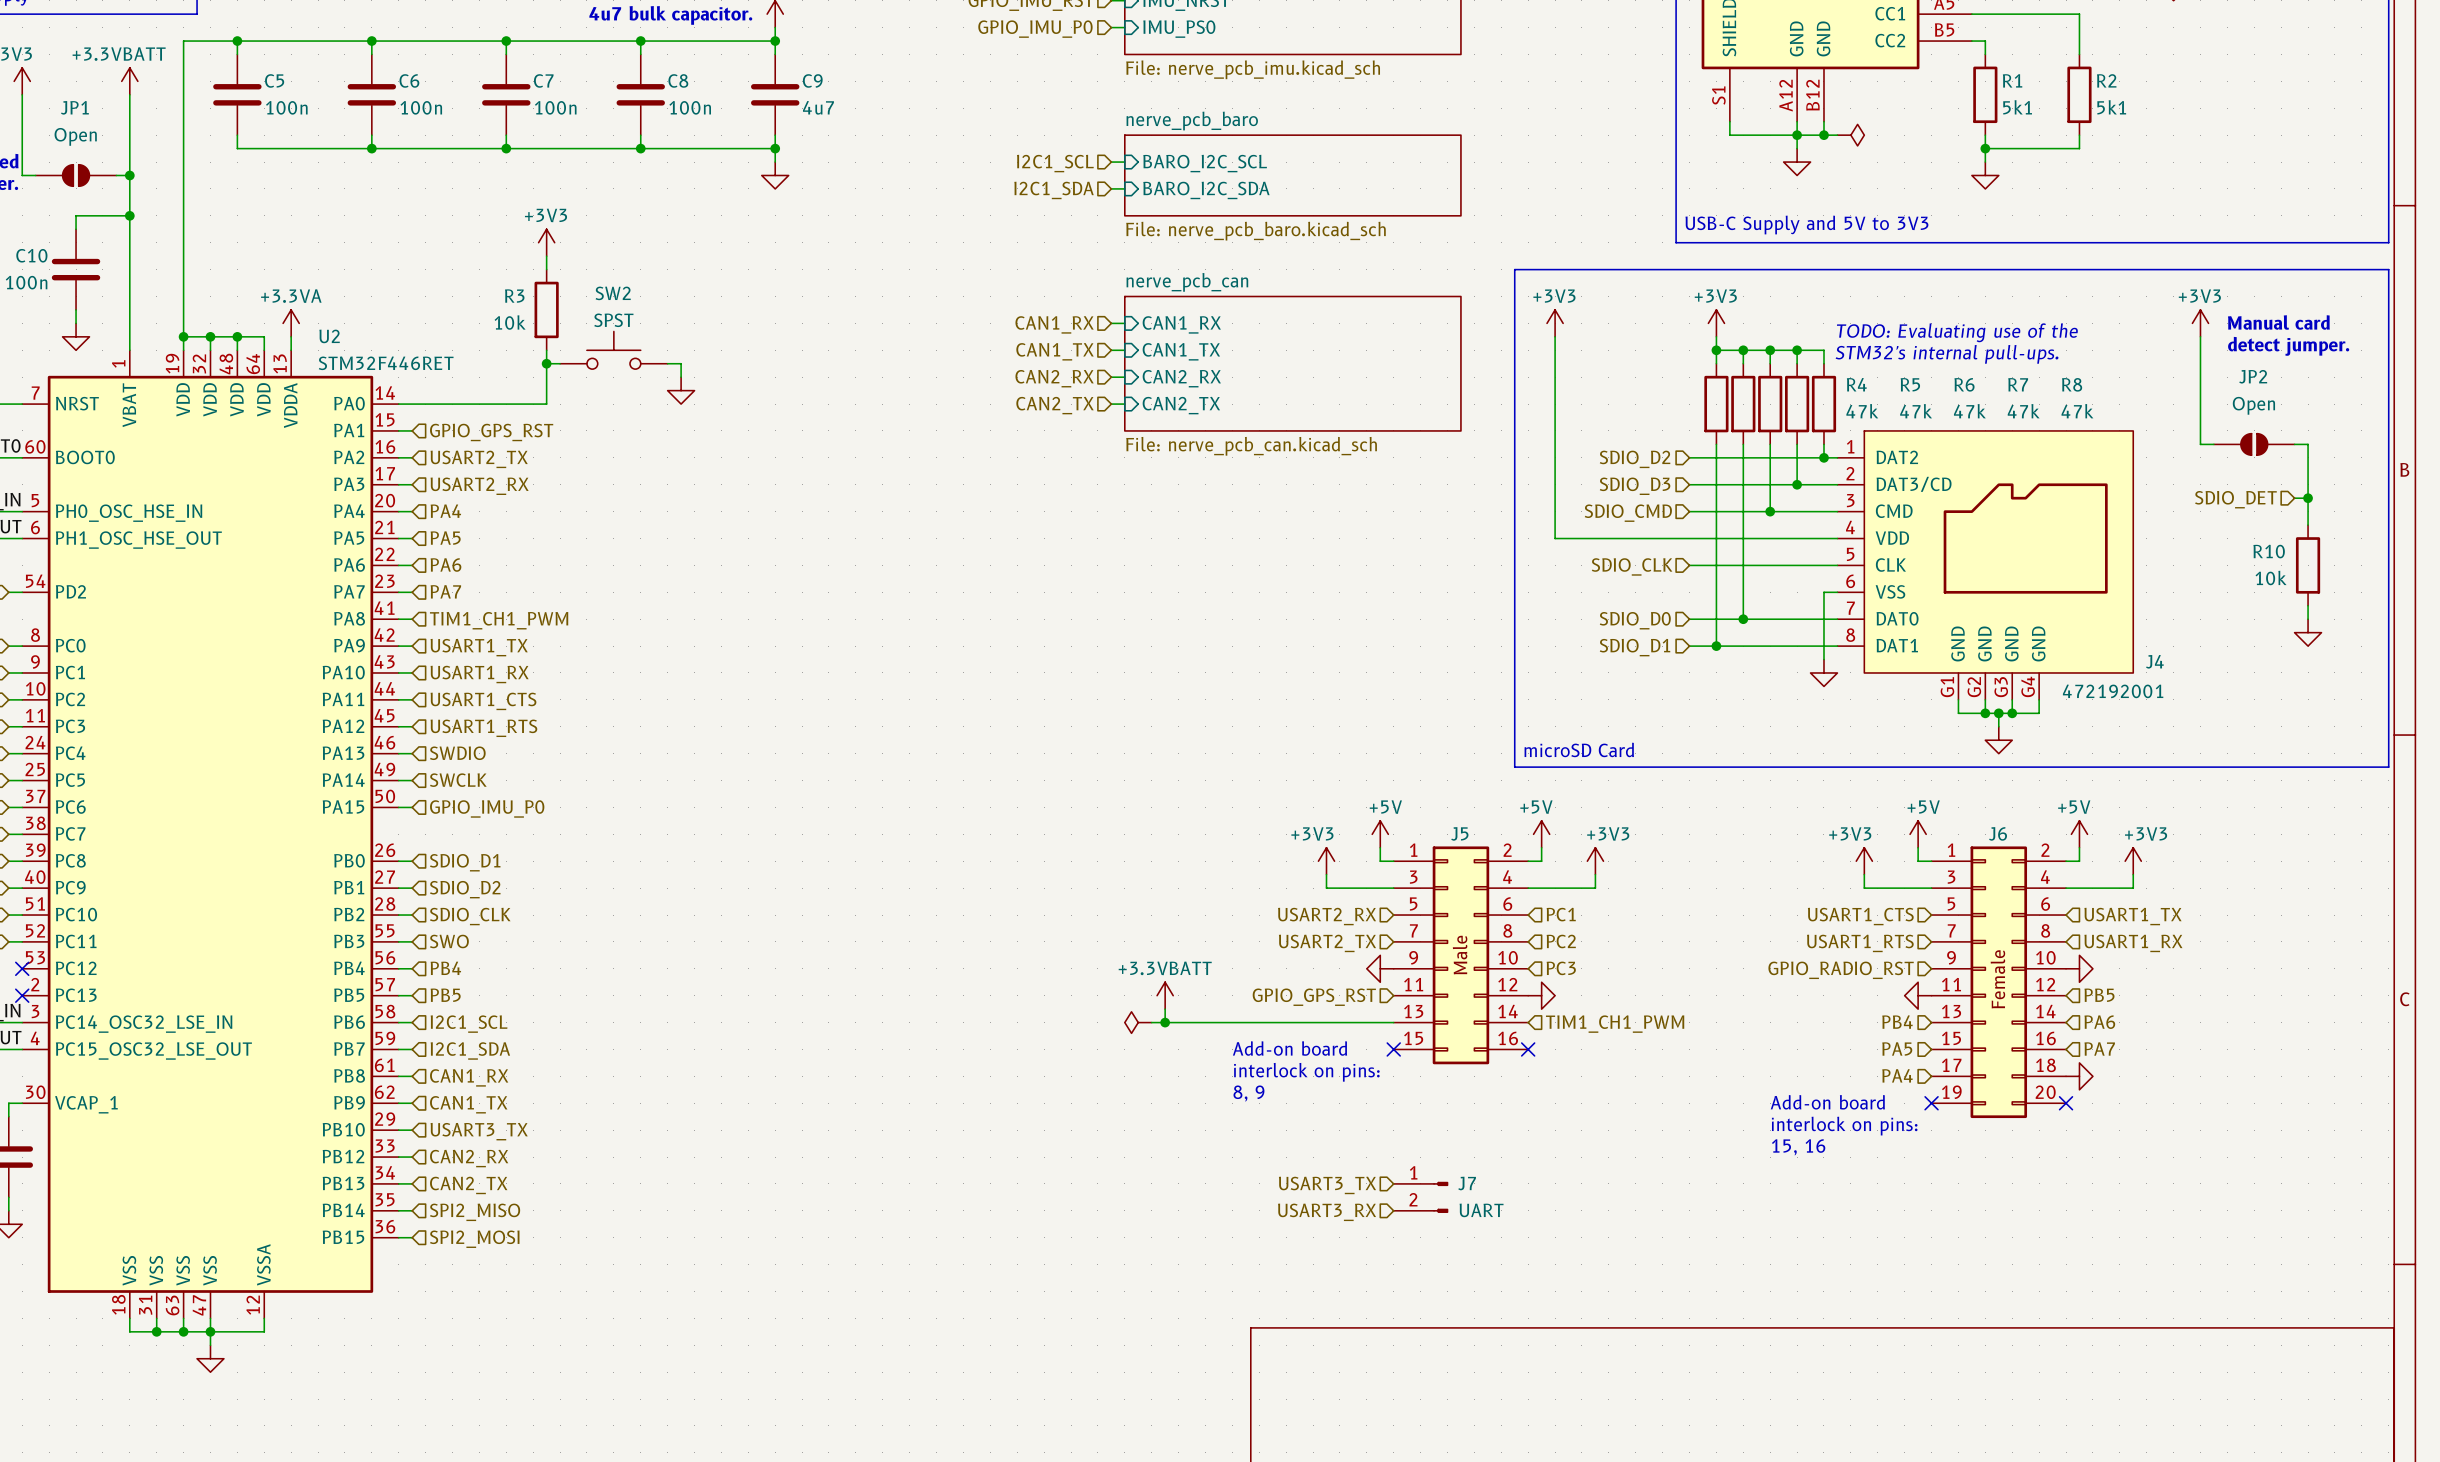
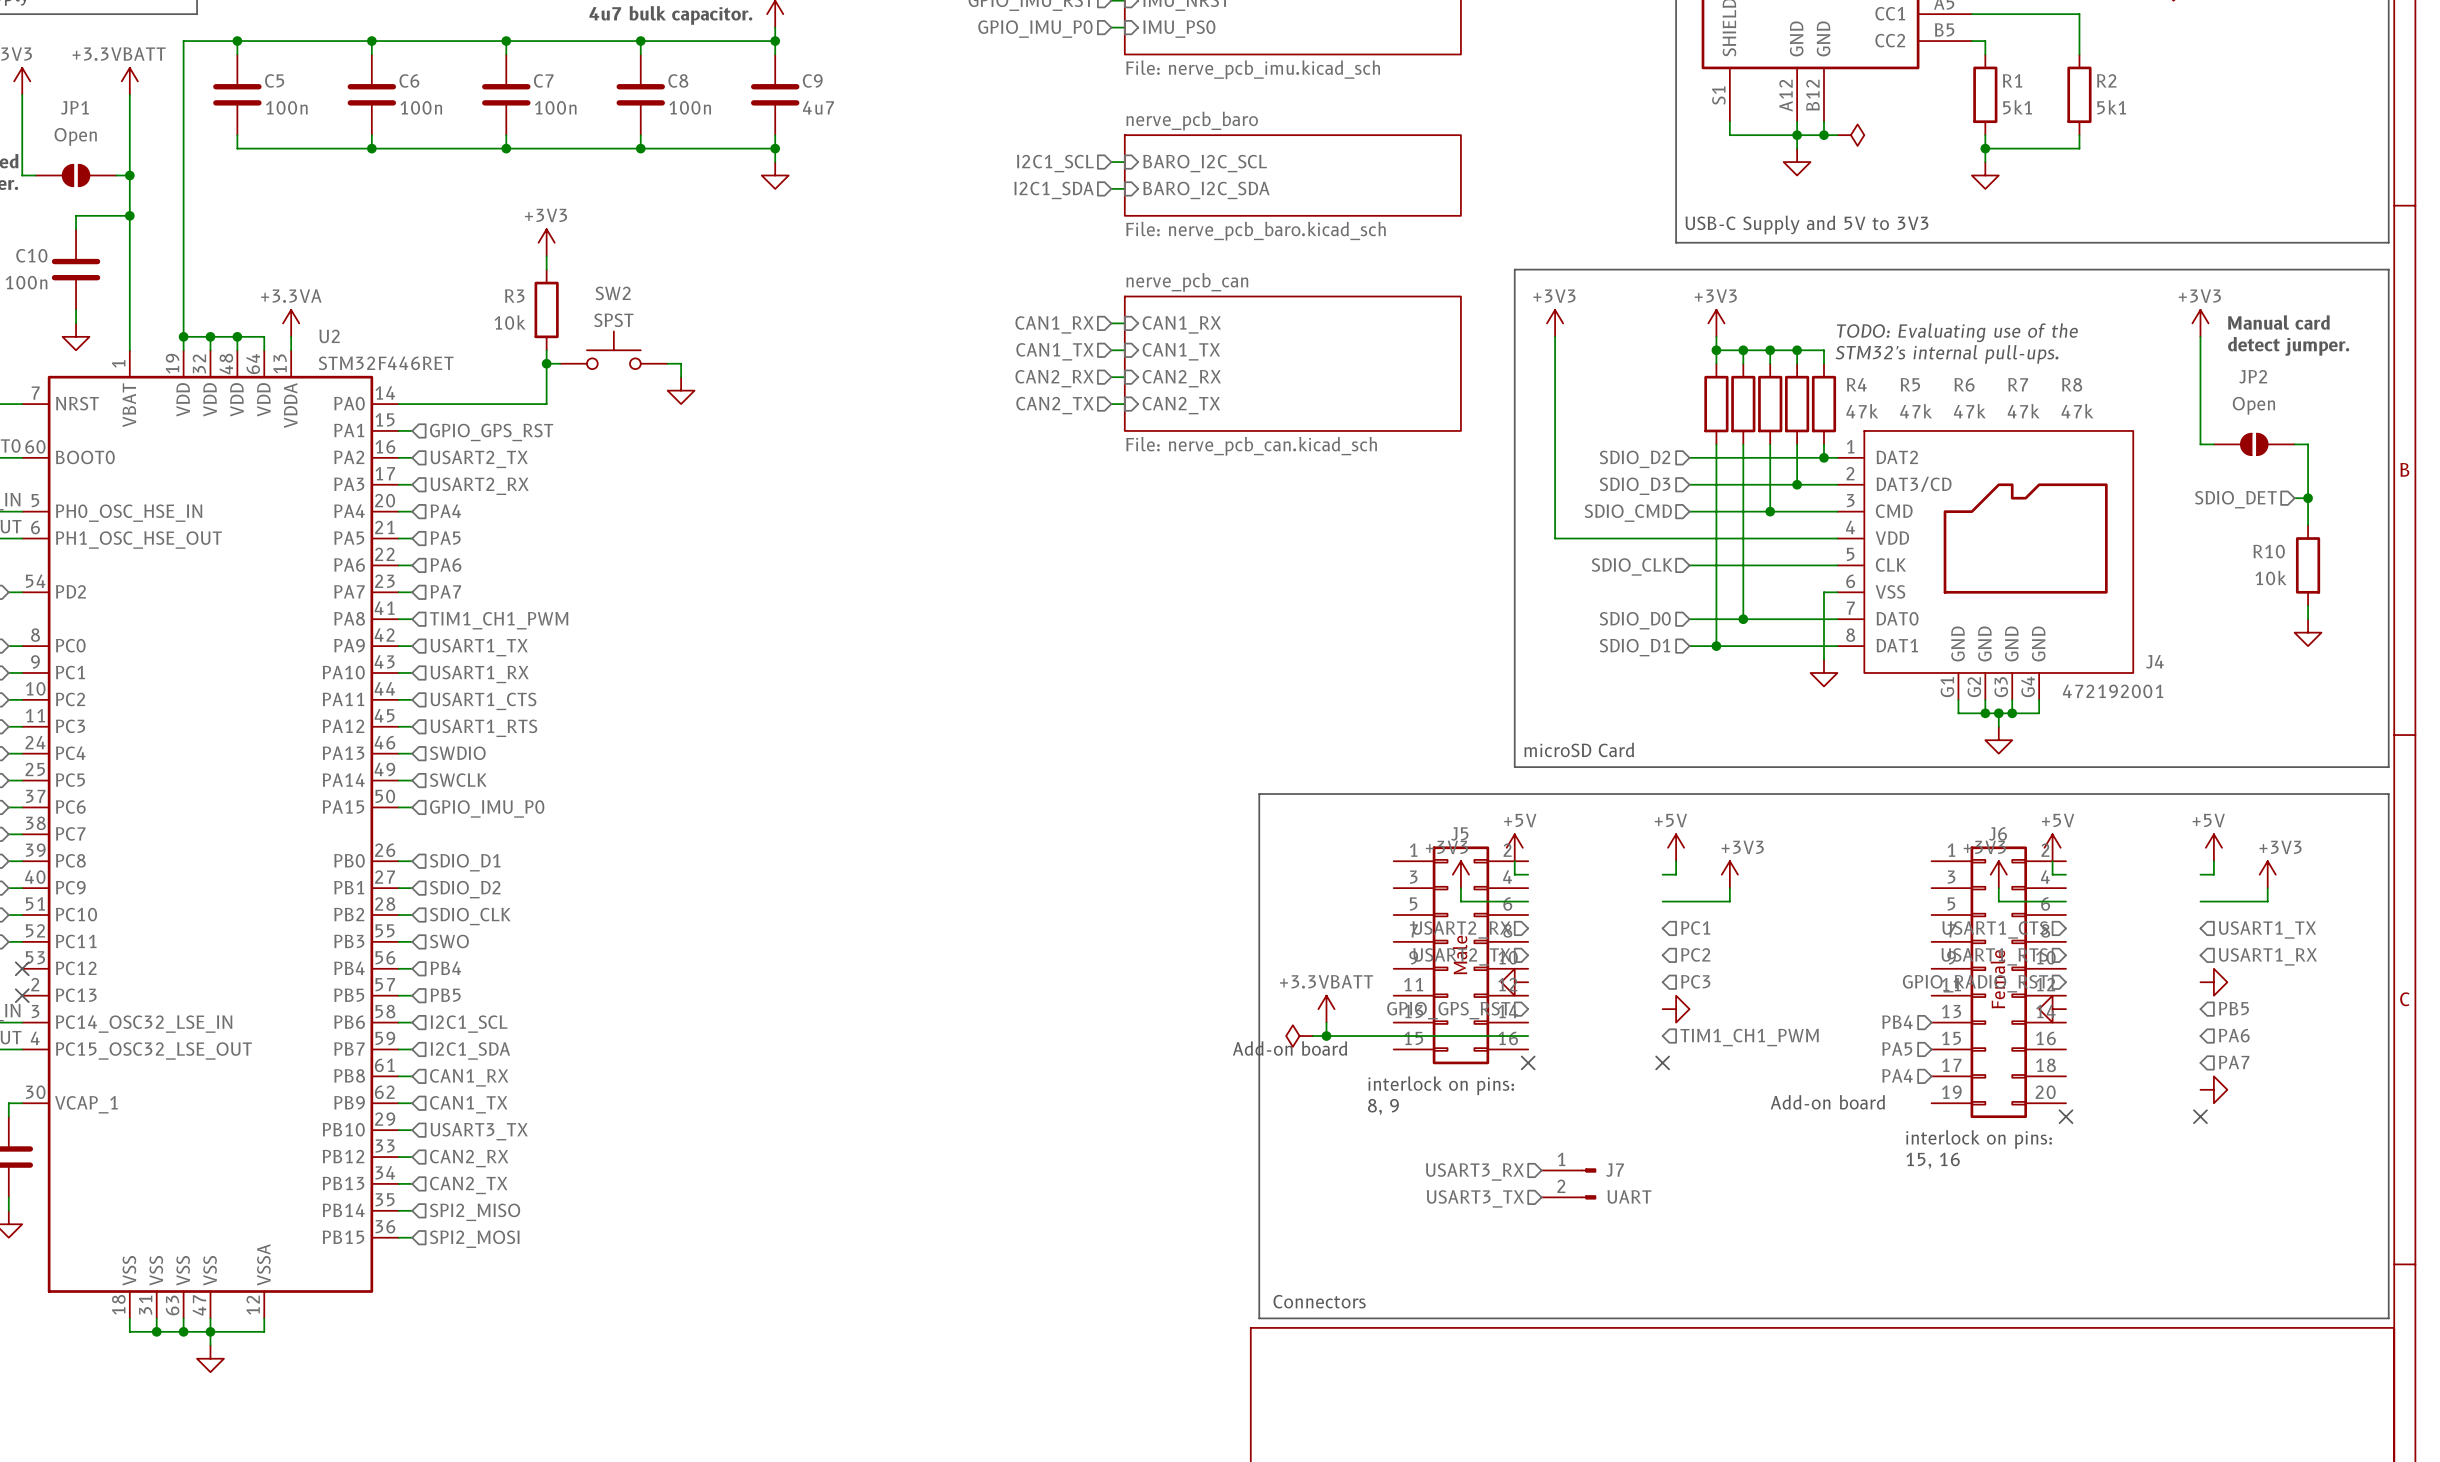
line: none -> (1259, 794) (2388, 794) (2388, 1318) (1259, 1318) (1259, 794)
power symbol text position: +5V (1536, 807) -> +5V (1520, 820)
power symbol text position: +5V (2074, 807) -> +5V (2058, 820)
power symbol: +5V (1380, 834) -> none
power symbol position: +5V (1541, 834) -> +5V (1514, 847)
power symbol: +5V (1918, 834) -> none
power symbol position: +5V (2079, 834) -> +5V (2052, 847)
wire: (1380, 847) (1380, 861) (1393, 861) -> (1514, 861) (1514, 874) (1528, 874)
wire: (1541, 847) (1541, 861) (1528, 861) -> (1676, 861) (1676, 874) (1662, 874)
power symbol: none -> +5V (1676, 847)
wire: (1918, 847) (1918, 861) (1931, 861) -> (2052, 861) (2052, 874) (2066, 874)
wire: (2079, 847) (2079, 861) (2066, 861) -> (2213, 861) (2213, 874) (2200, 874)
power symbol: none -> +5V (2213, 847)
power symbol: +3V3 (1326, 861) -> none
power symbol: +3V3 (1595, 861) -> none
power symbol: +3V3 (1864, 861) -> none
power symbol: +3V3 (2133, 861) -> none
wire: (1326, 874) (1326, 888) (1393, 888) -> (1460, 888) (1460, 901) (1528, 901)
power symbol: none -> +3V3 (1460, 874)
wire: (1595, 874) (1595, 888) (1528, 888) -> (1729, 888) (1729, 901) (1662, 901)
power symbol: none -> +3V3 (1729, 874)
wire: (1864, 874) (1864, 888) (1931, 888) -> (1998, 888) (1998, 901) (2066, 901)
power symbol: none -> +3V3 (1998, 874)
wire: (2133, 874) (2133, 888) (2066, 888) -> (2267, 888) (2267, 901) (2200, 901)
power symbol: none -> +3V3 (2267, 874)
hierarchical label position: PC1 (1561, 914) -> PC1 (1695, 928)
hierarchical label position: USART2_RX (1327, 916) -> USART2_RX (1461, 929)
hierarchical label position: USART1_CTS (1860, 916) -> USART1_CTS (1995, 929)
hierarchical label position: USART1_TX (2133, 916) -> USART1_TX (2267, 929)
hierarchical label position: PC2 (1561, 941) -> PC2 (1695, 954)
hierarchical label position: USART2_TX (1327, 943) -> USART2_TX (1461, 956)
hierarchical label position: USART1_RTS (1860, 943) -> USART1_RTS (1994, 956)
hierarchical label position: USART1_RX (2133, 943) -> USART1_RX (2267, 956)
power symbol: (1380, 968) -> none
hierarchical label position: PC3 (1561, 968) -> PC3 (1695, 981)
power symbol: (2079, 968) -> none
hierarchical label position: GPIO_RADIO_RST (1841, 970) -> GPIO_RADIO_RST (1975, 983)
power symbol: none -> (2213, 982)
power symbol position: +3.3VBATT (1165, 995) -> +3.3VBATT (1326, 1009)
power symbol rotation: 0° (1541, 995) -> 180° (1514, 982)
power symbol position: (1541, 995) -> (1514, 982)
power symbol: (1918, 995) -> none
hierarchical label position: PB5 (2099, 995) -> PB5 (2233, 1008)
hierarchical label position: GPIO_GPS_RST (1314, 997) -> GPIO_GPS_RST (1448, 1010)
wire: (1165, 1009) (1165, 1022) -> (1326, 1022) (1326, 1036)
power symbol: none -> (1676, 1009)
power symbol: none -> (2052, 1009)
power symbol position: (1138, 1022) -> (1299, 1036)
wire: (1151, 1022) (1393, 1022) -> none
junction: (1165, 1022) -> none
hierarchical label position: PA6 (2099, 1022) -> PA6 (2234, 1035)
hierarchical label position: TIM1_CH1_PWM (1615, 1024) -> TIM1_CH1_PWM (1749, 1037)
wire: none -> (1313, 1036) (1528, 1036)
junction: none -> (1326, 1036)
hierarchical label position: PA7 (2099, 1048) -> PA7 (2234, 1062)
no-connect mark: (1393, 1049) -> none
no-connect mark position: (1528, 1049) -> (1528, 1062)
no-connect mark: none -> (1662, 1062)
text position: interlock on pins: (1306, 1072) -> interlock on pins: (1441, 1085)
power symbol: (2079, 1076) -> none
power symbol: none -> (2213, 1089)
text position: 8, 9 (1248, 1093) -> 8, 9 (1383, 1106)
no-connect mark: (1931, 1103) -> none
no-connect mark position: (2066, 1103) -> (2066, 1116)
no-connect mark: none -> (2200, 1116)
text position: interlock on pins: (1844, 1126) -> interlock on pins: (1979, 1139)
text position: 15, 16 (1798, 1147) -> 15, 16 (1933, 1160)
hierarchical label position: USART3_TX (1327, 1185) -> USART3_TX (1475, 1198)
J7 position: (1421, 1197) -> (1568, 1183)
hierarchical label position: USART3_RX (1327, 1212) -> USART3_RX (1474, 1172)
text: none -> Connectors (1319, 1301)

